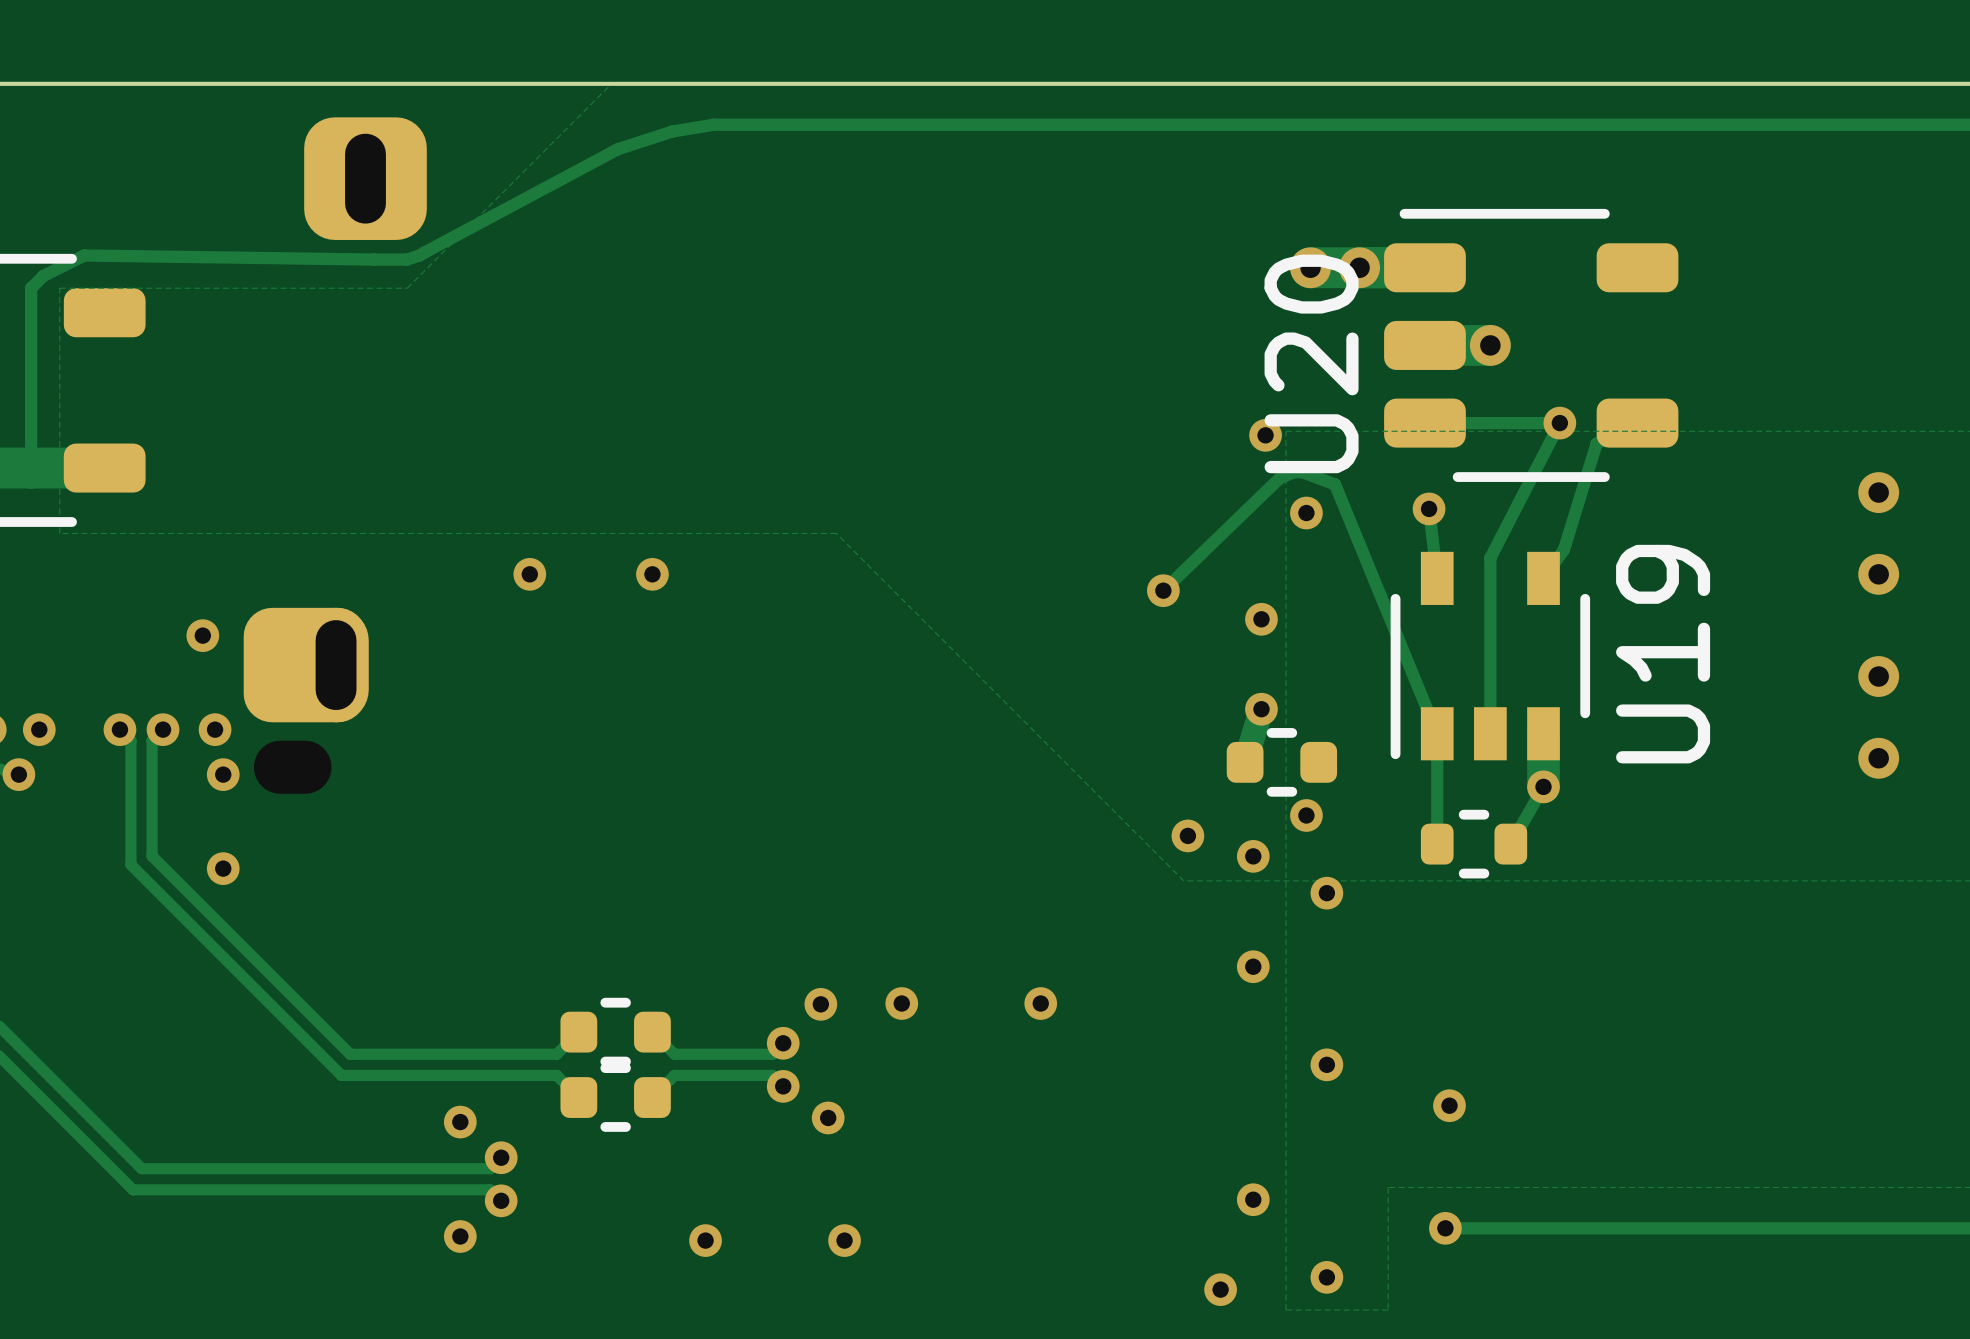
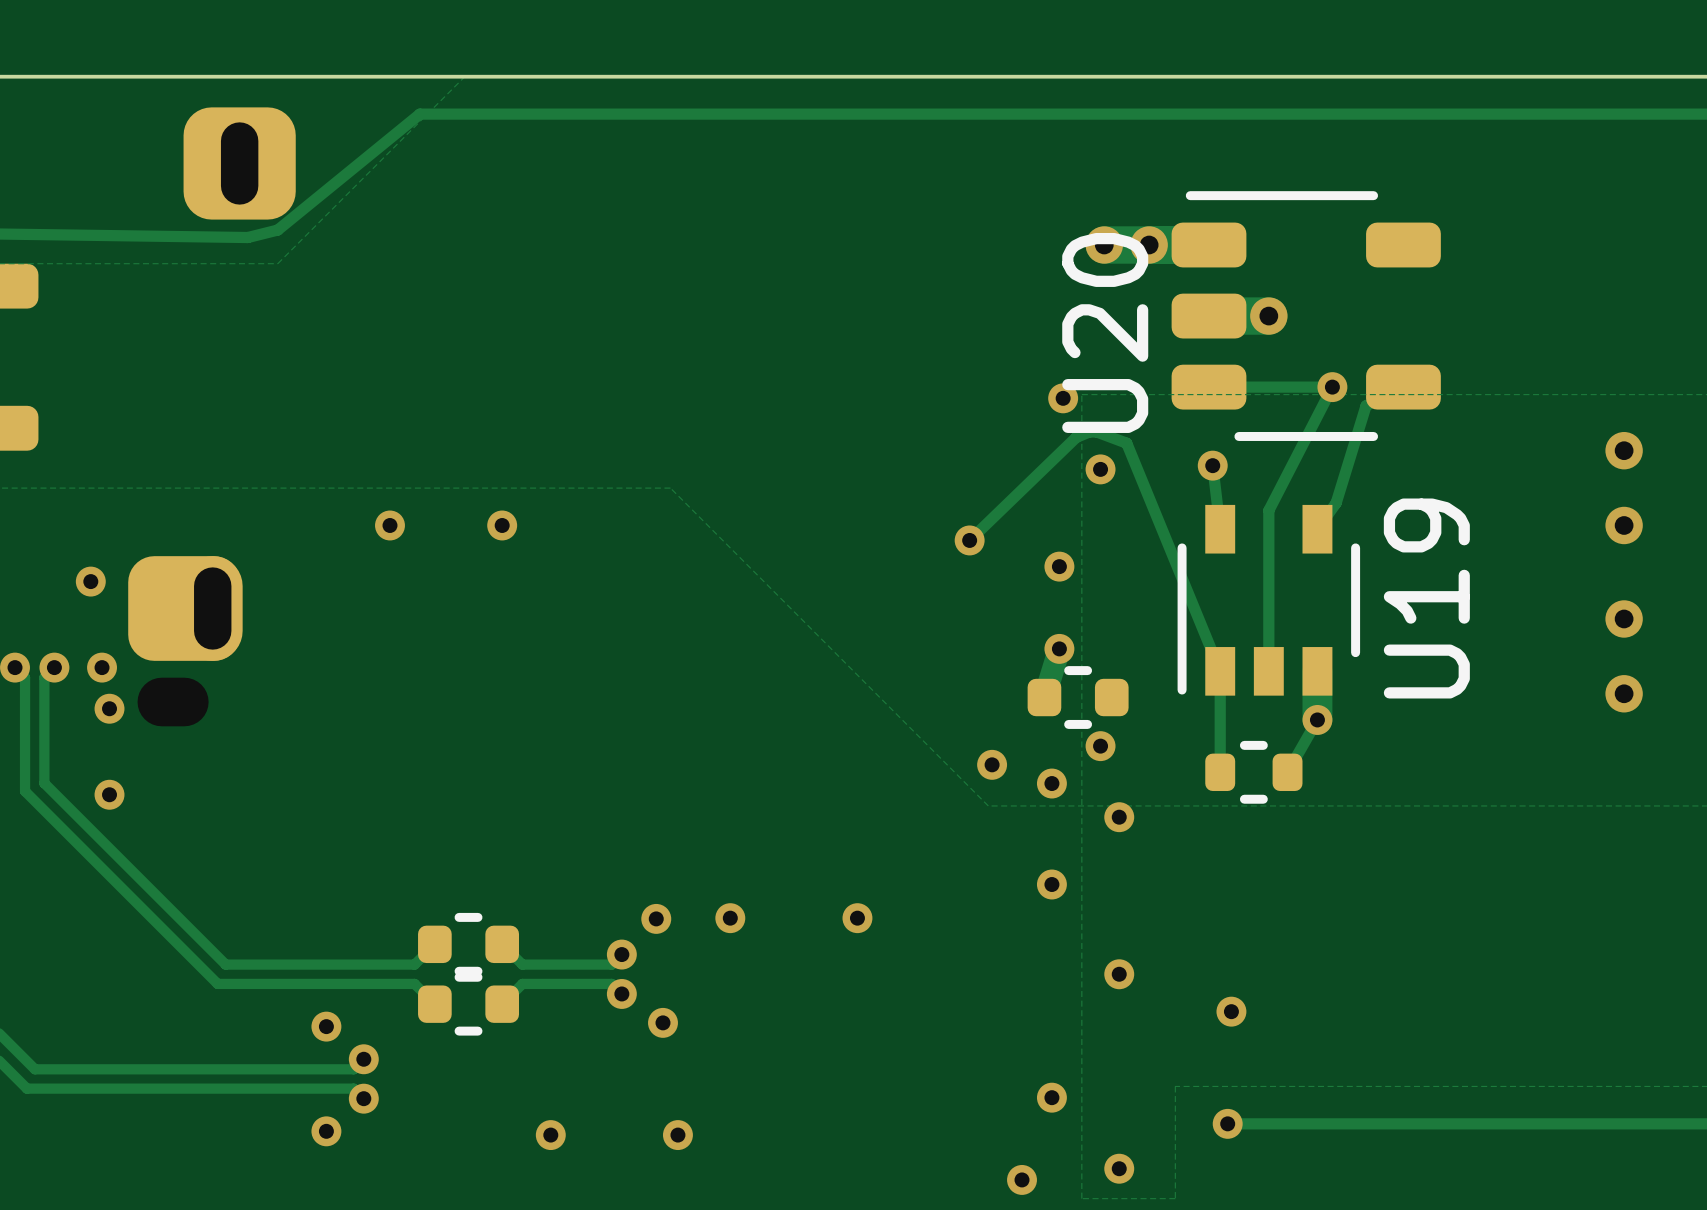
track: (713, 124) (672, 131) (617, 149) (419, 255) (407, 259) (374, 259) -> (558, 114) (419, 114) (277, 230) (247, 237)

